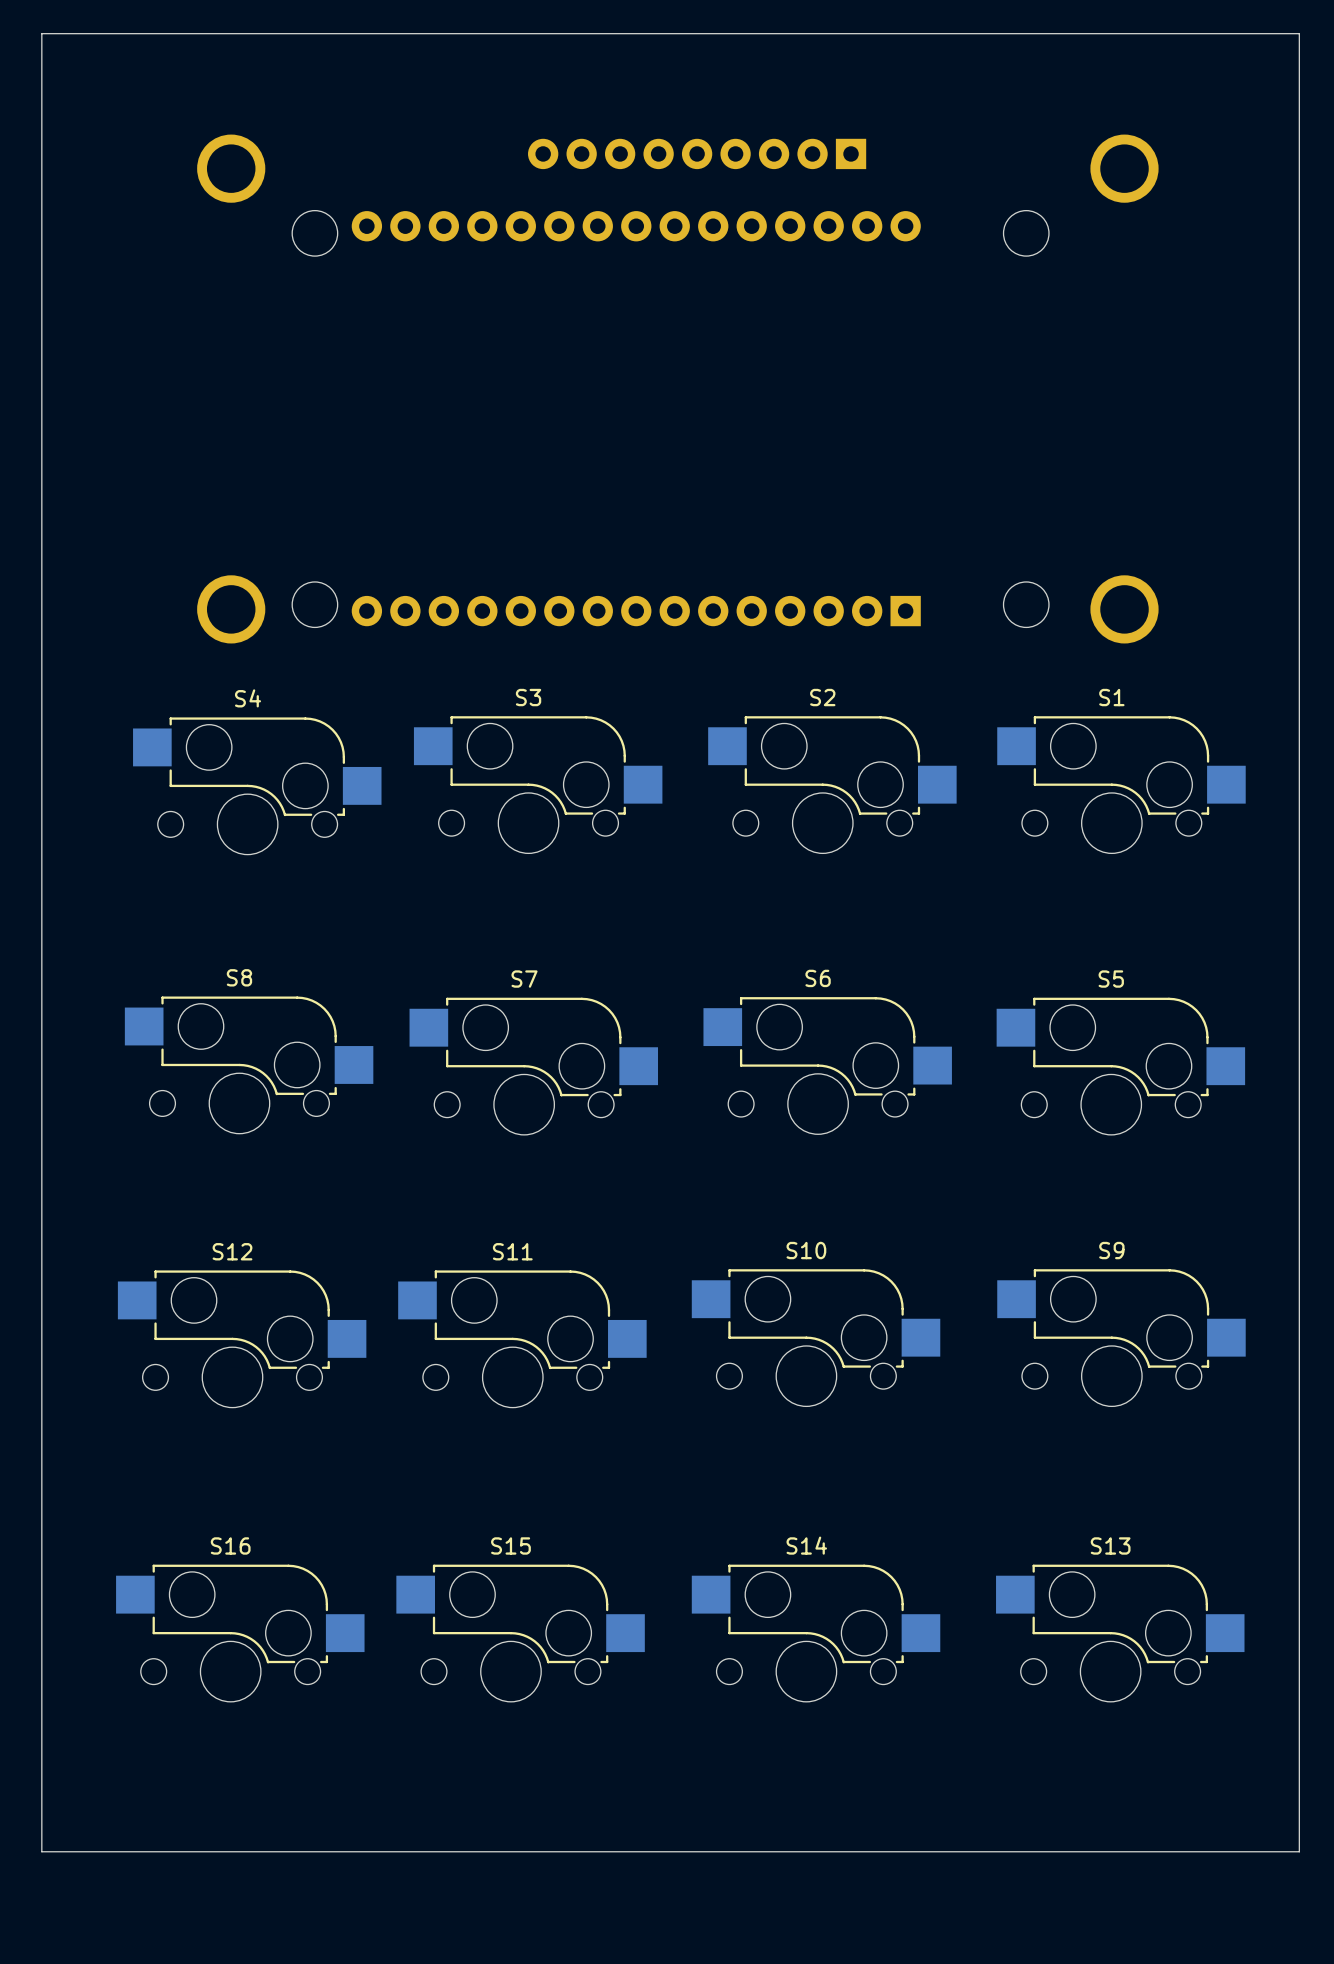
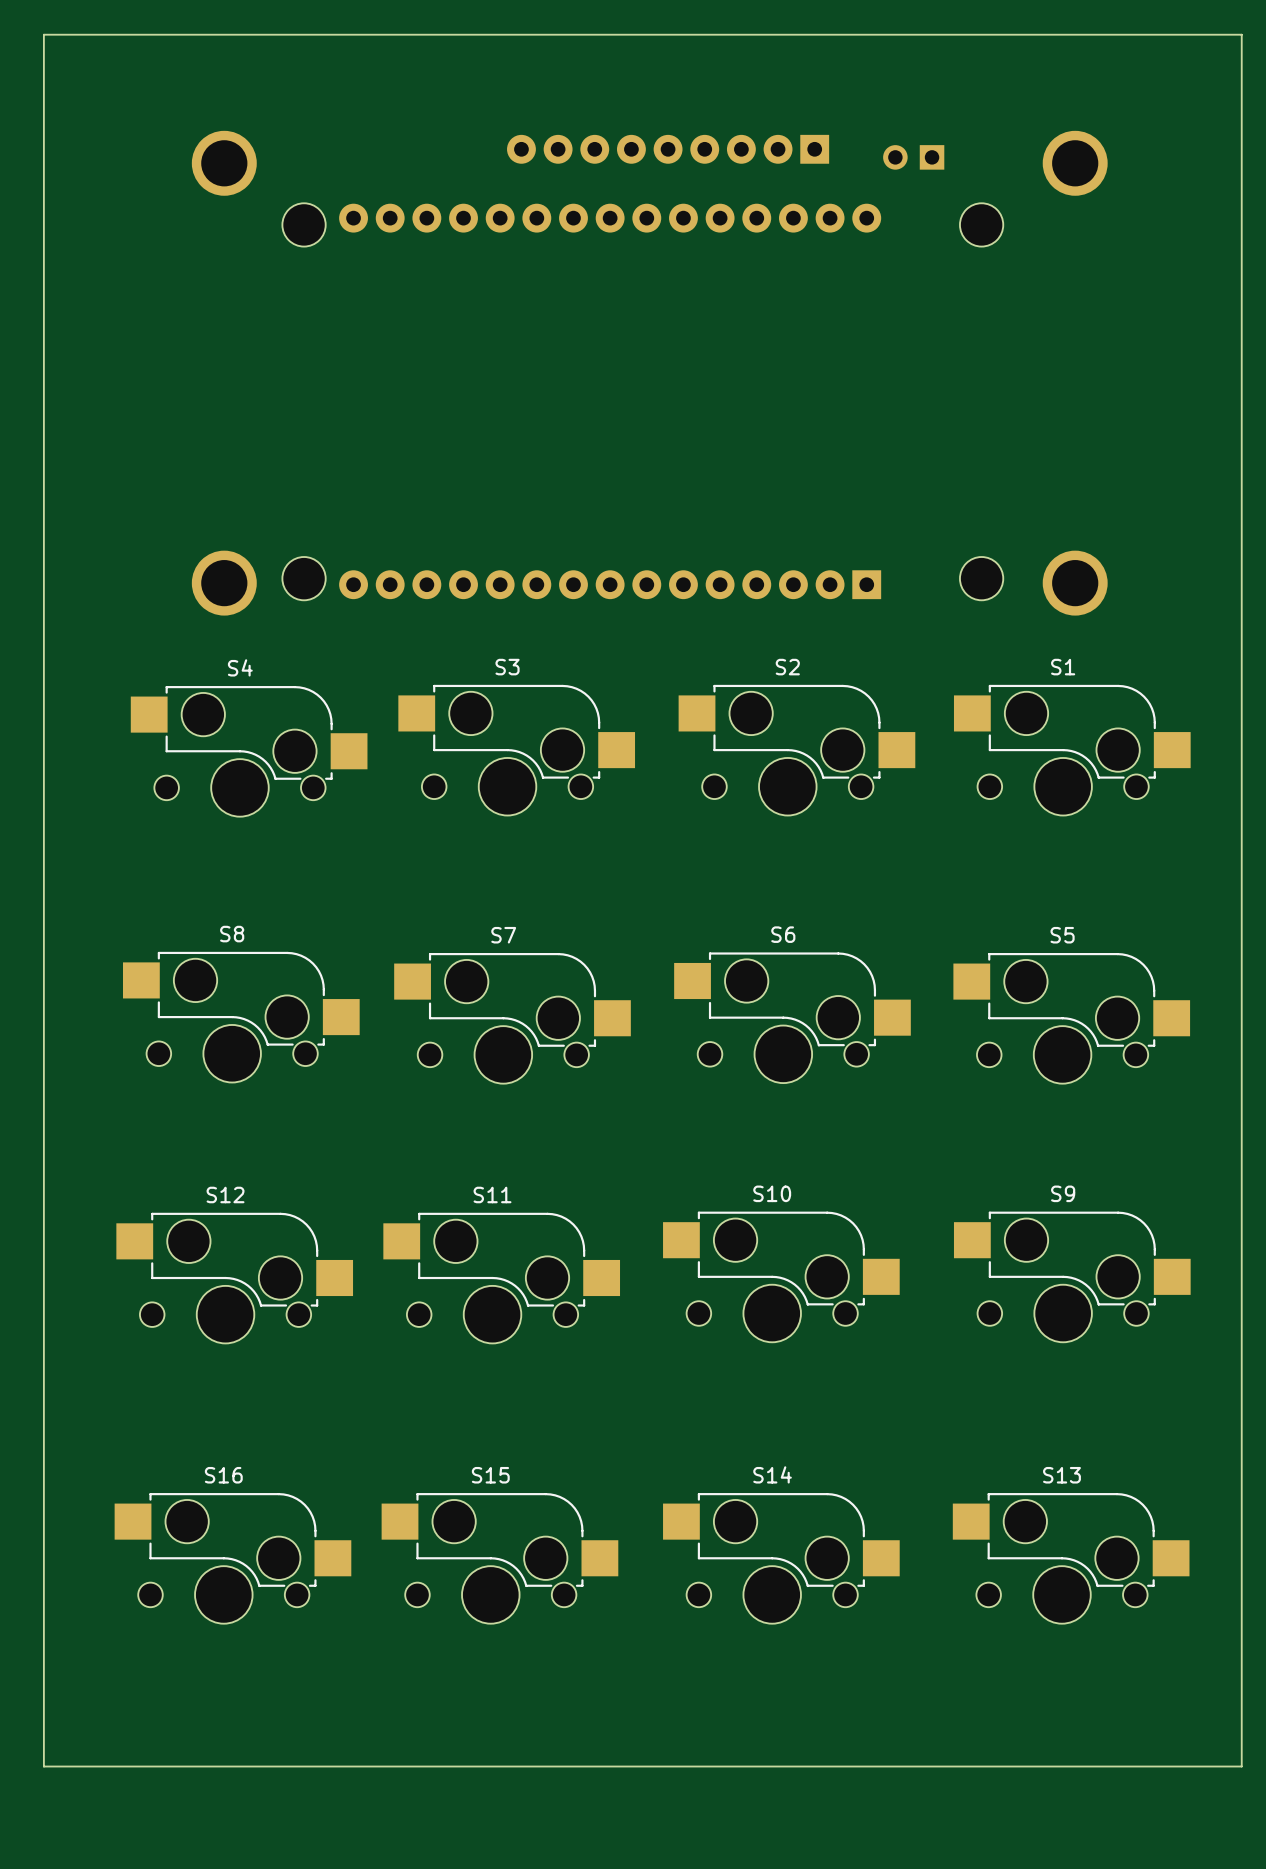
part: none -> (913, 157)

